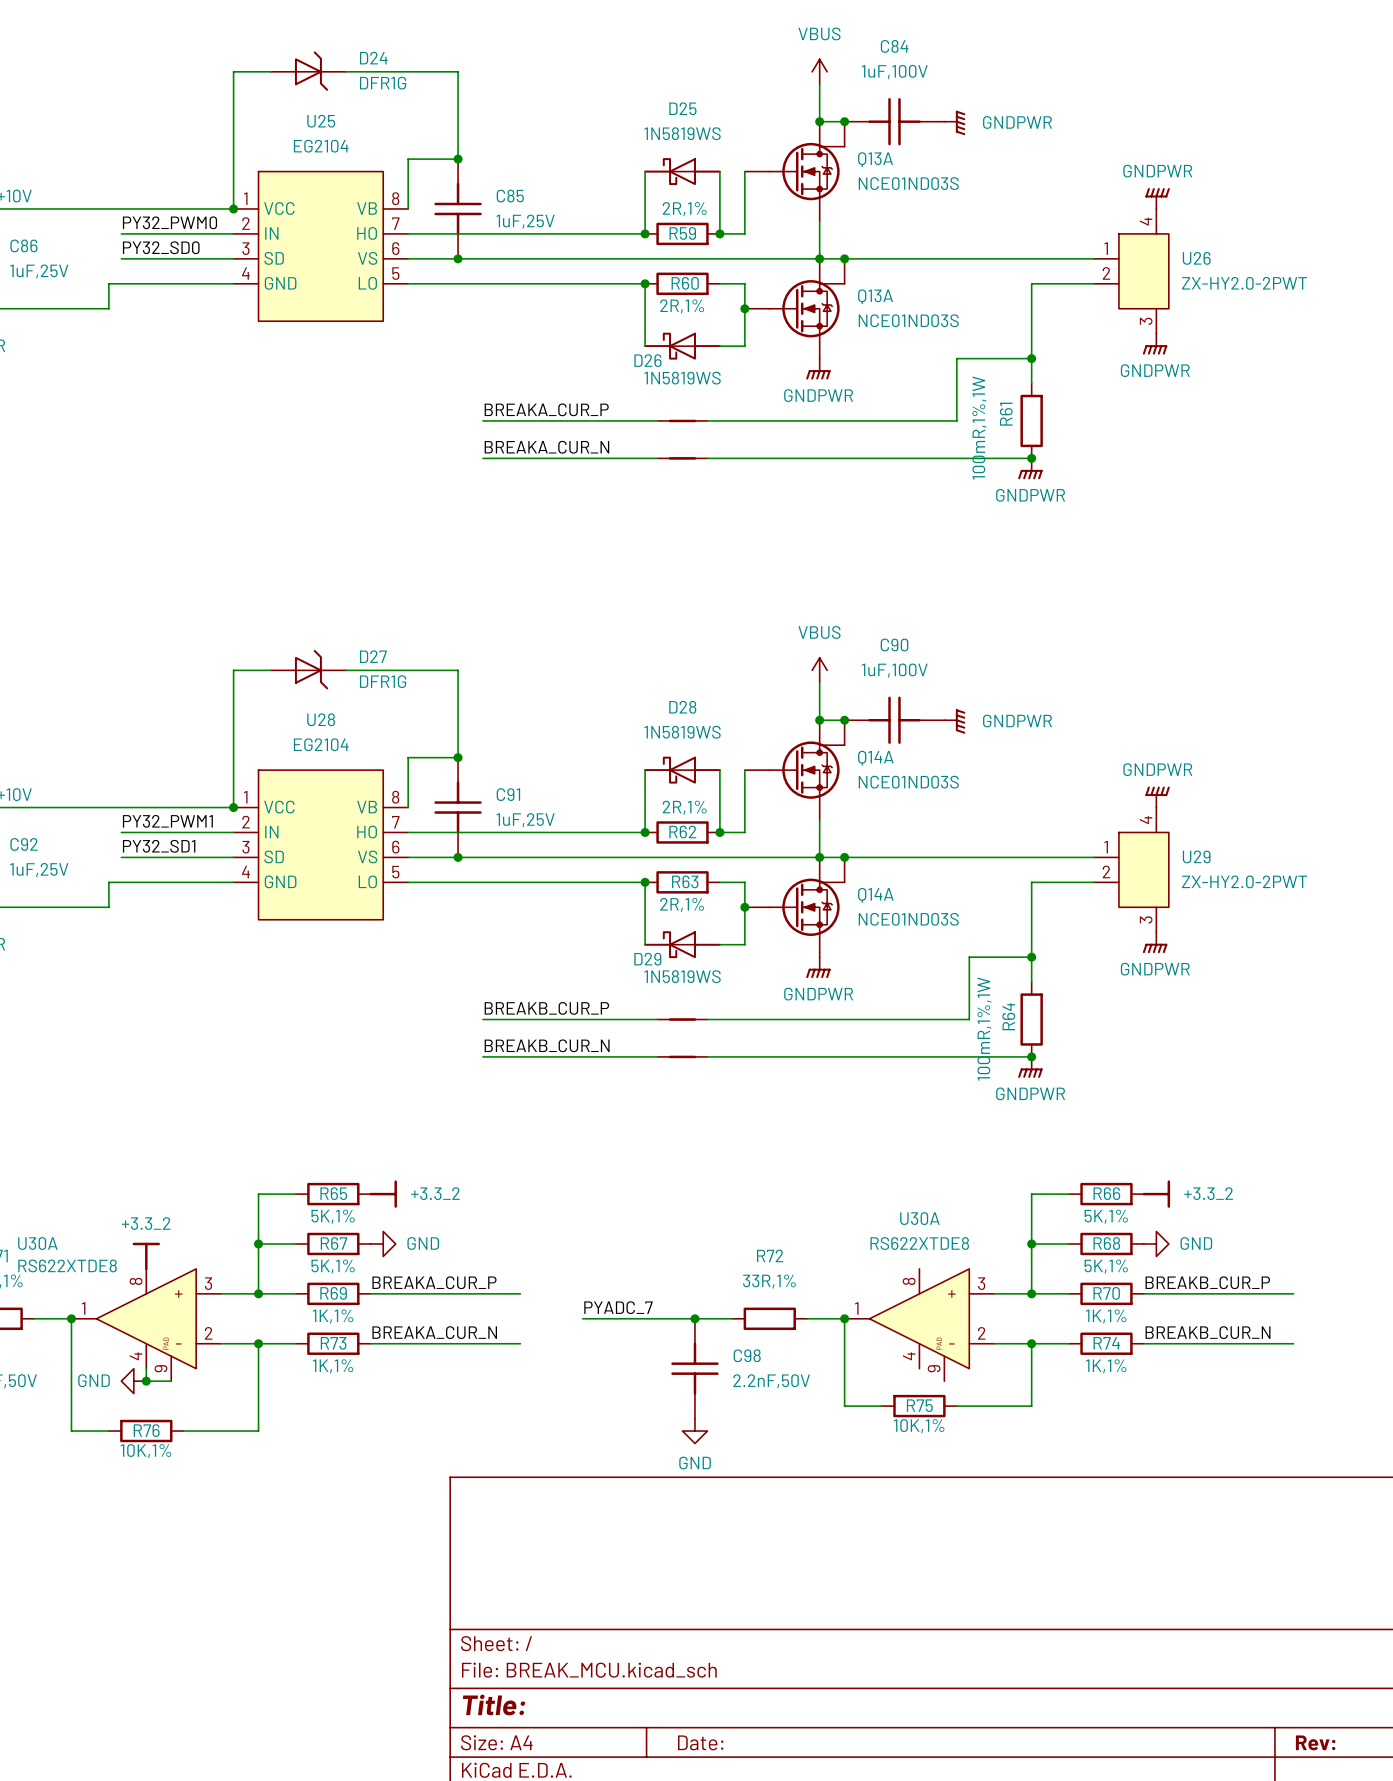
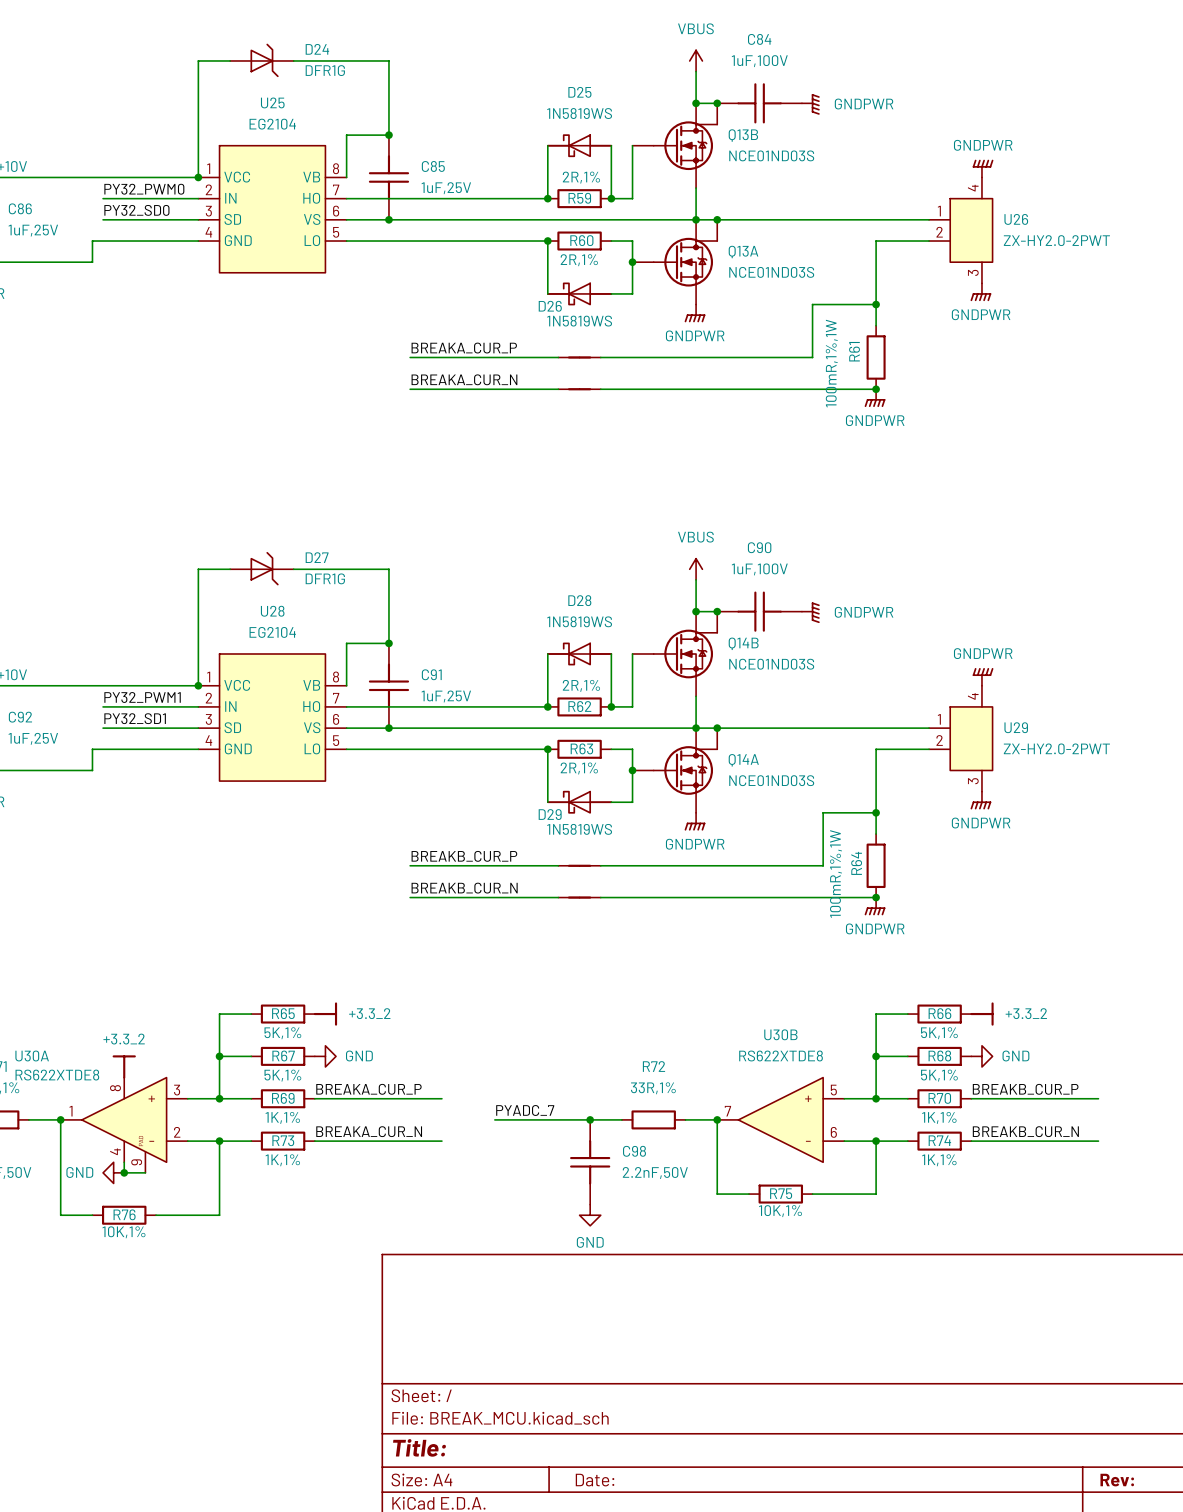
Q13A name: Q13A (875, 159) -> Q13B (743, 135)
Q14A name: Q14A (875, 758) -> Q14B (743, 643)
U30B: none -> RS622XTDE8 (780, 1119)
U30A: RS622XTDE8 (919, 1325) -> none

